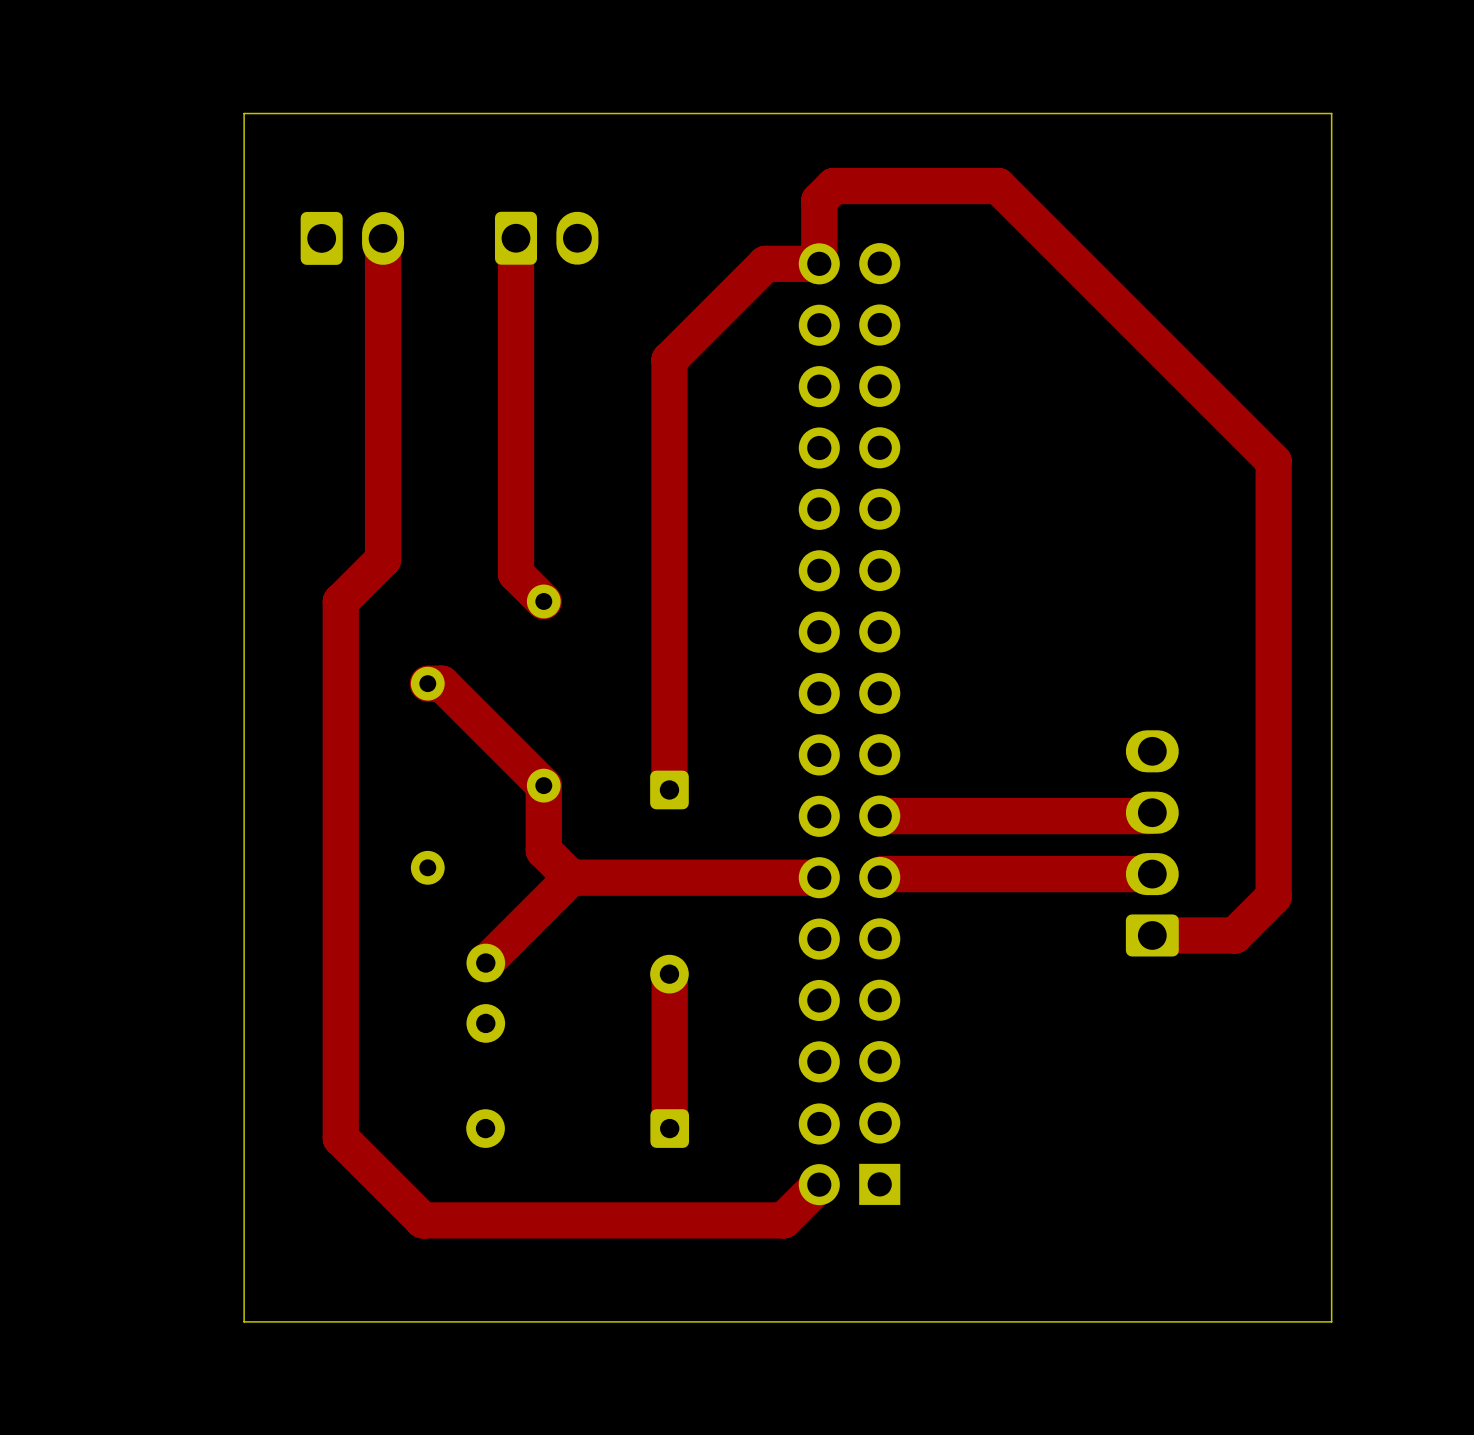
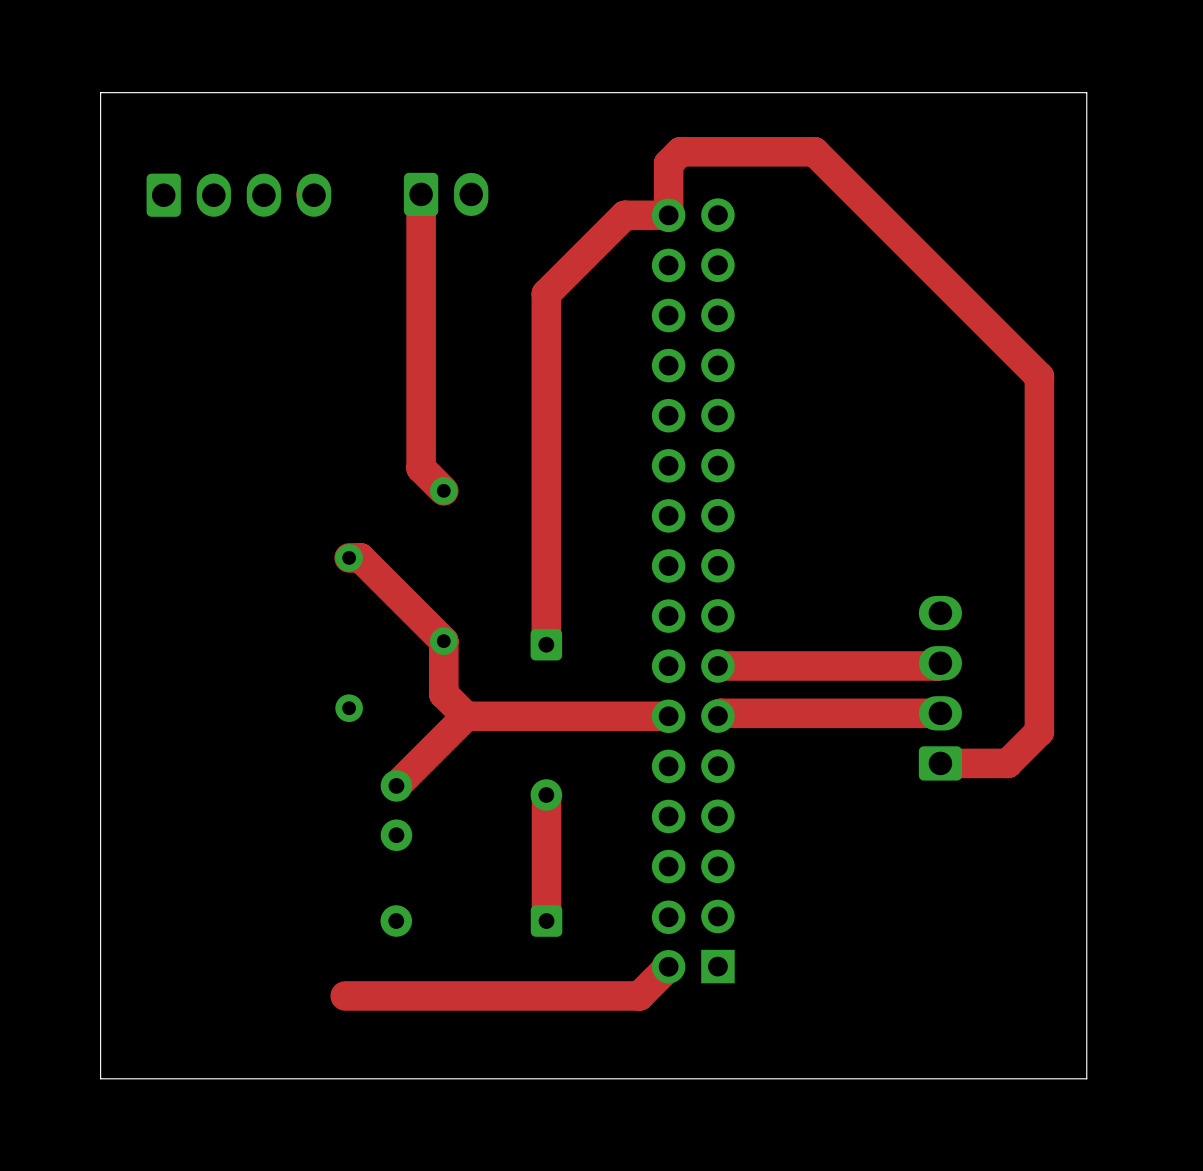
board edge: (244, 113) (244, 1321) -> (199, 92) (100, 92) (100, 1078) (199, 1078)
part: (352, 238) -> none
top track: (383, 238) (383, 559) (340, 601) (340, 1138) (422, 1220) -> none
part: none -> (238, 195)

